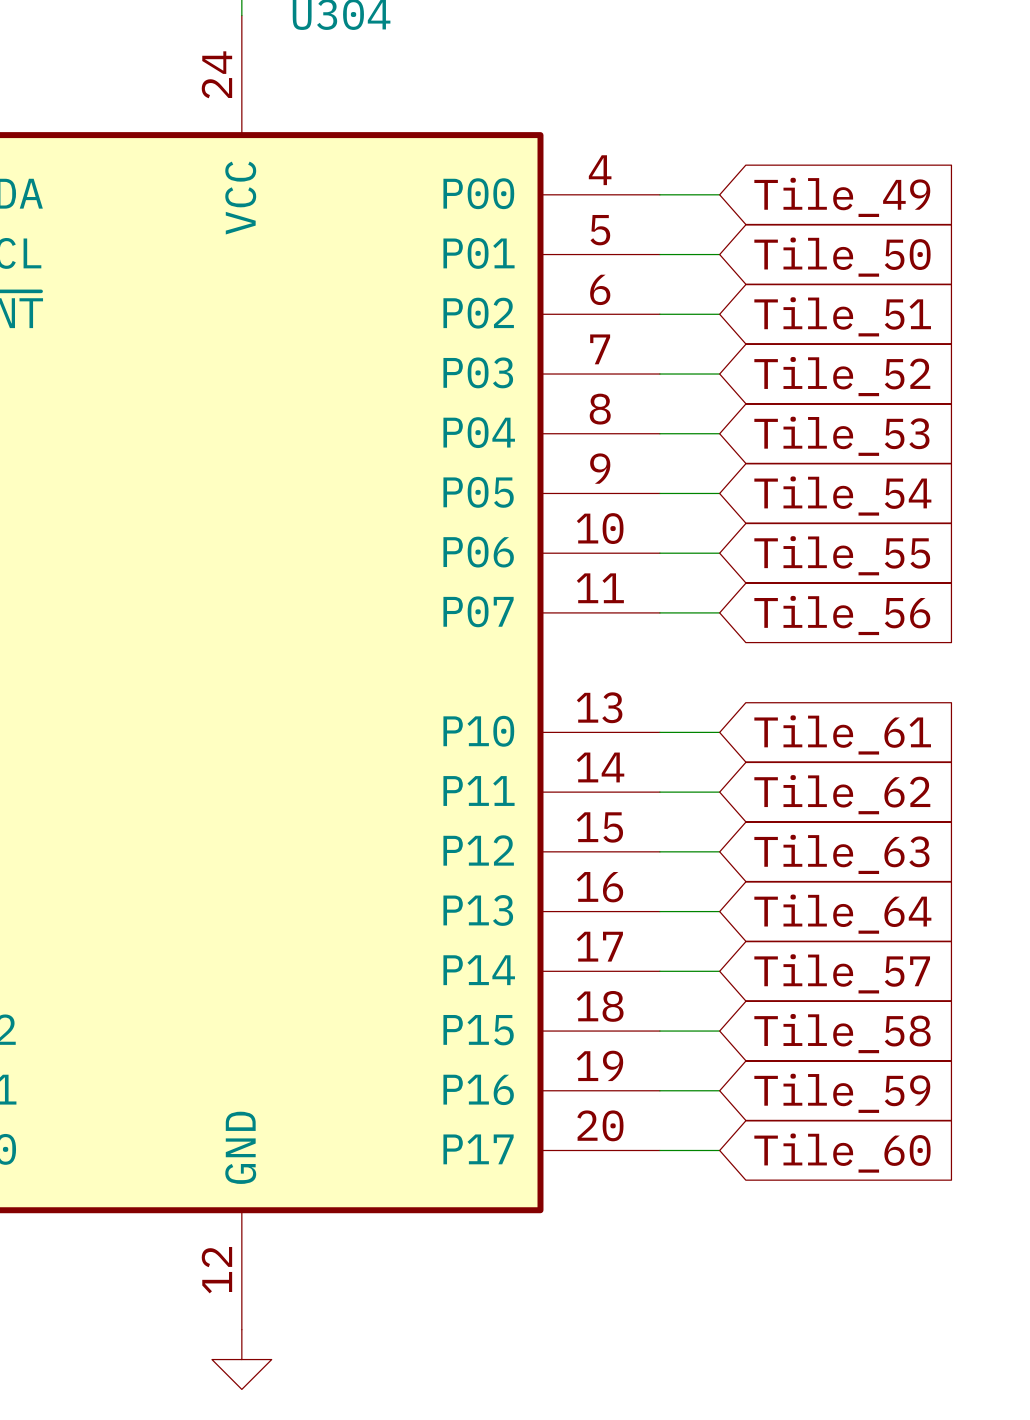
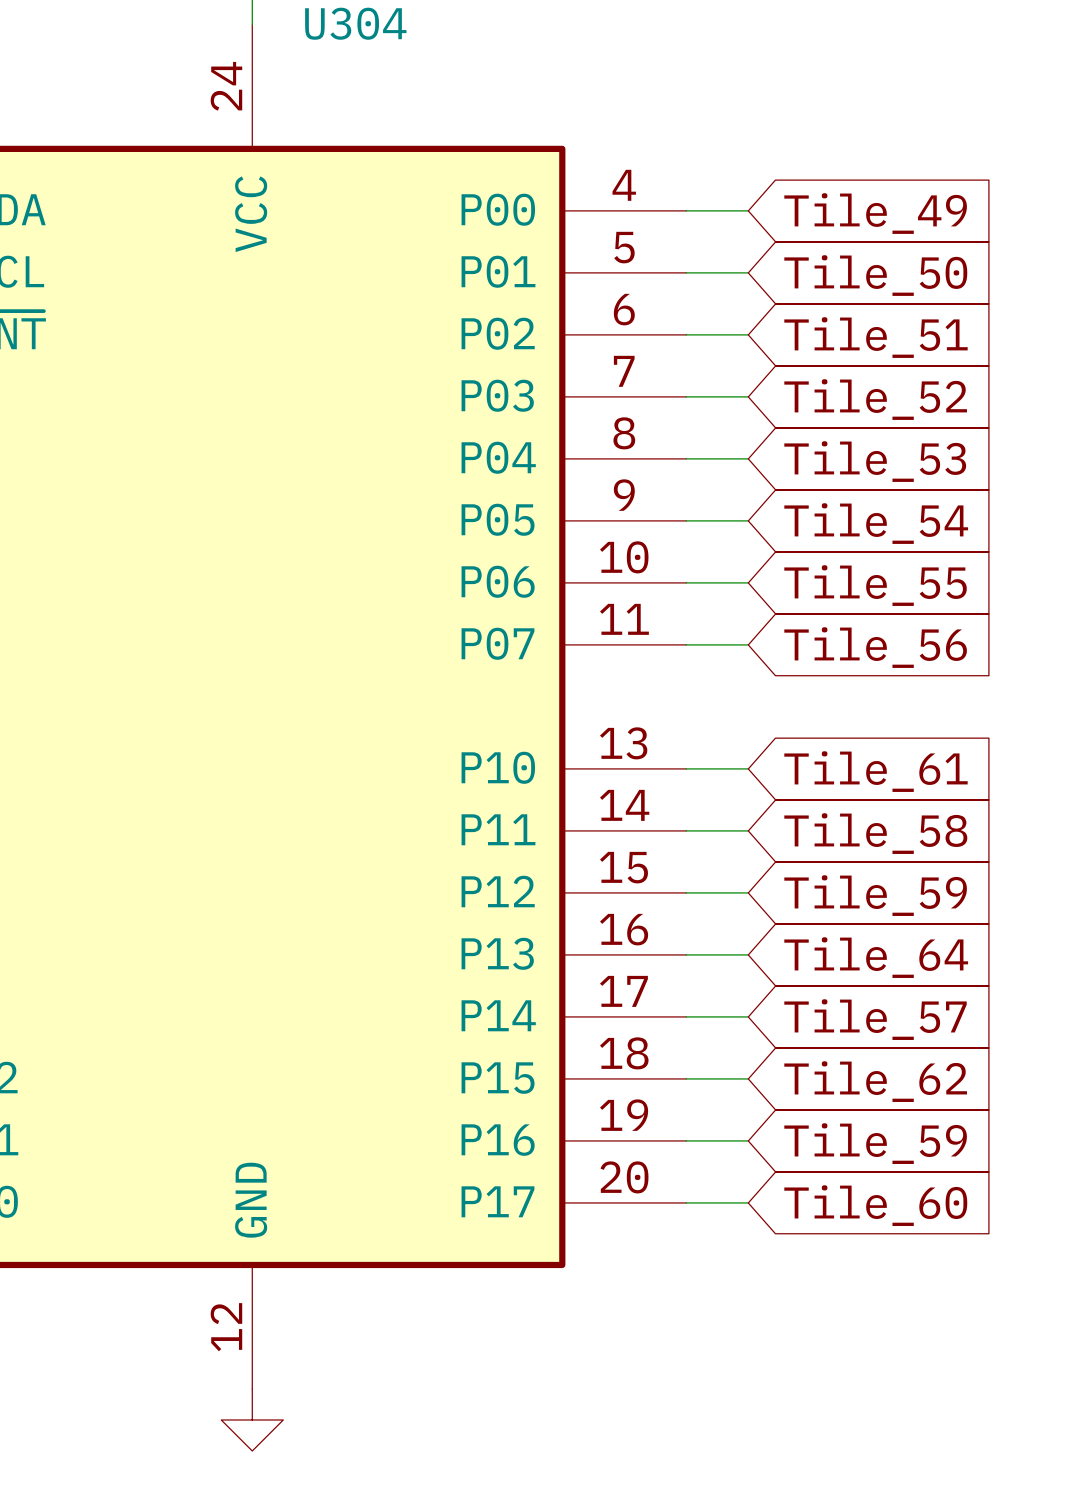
global label: Tile_62 (842, 794) -> Tile_58 (875, 833)
global label: Tile_63 (841, 854) -> Tile_59 (875, 895)
global label: Tile_58 (842, 1033) -> Tile_62 (875, 1081)

